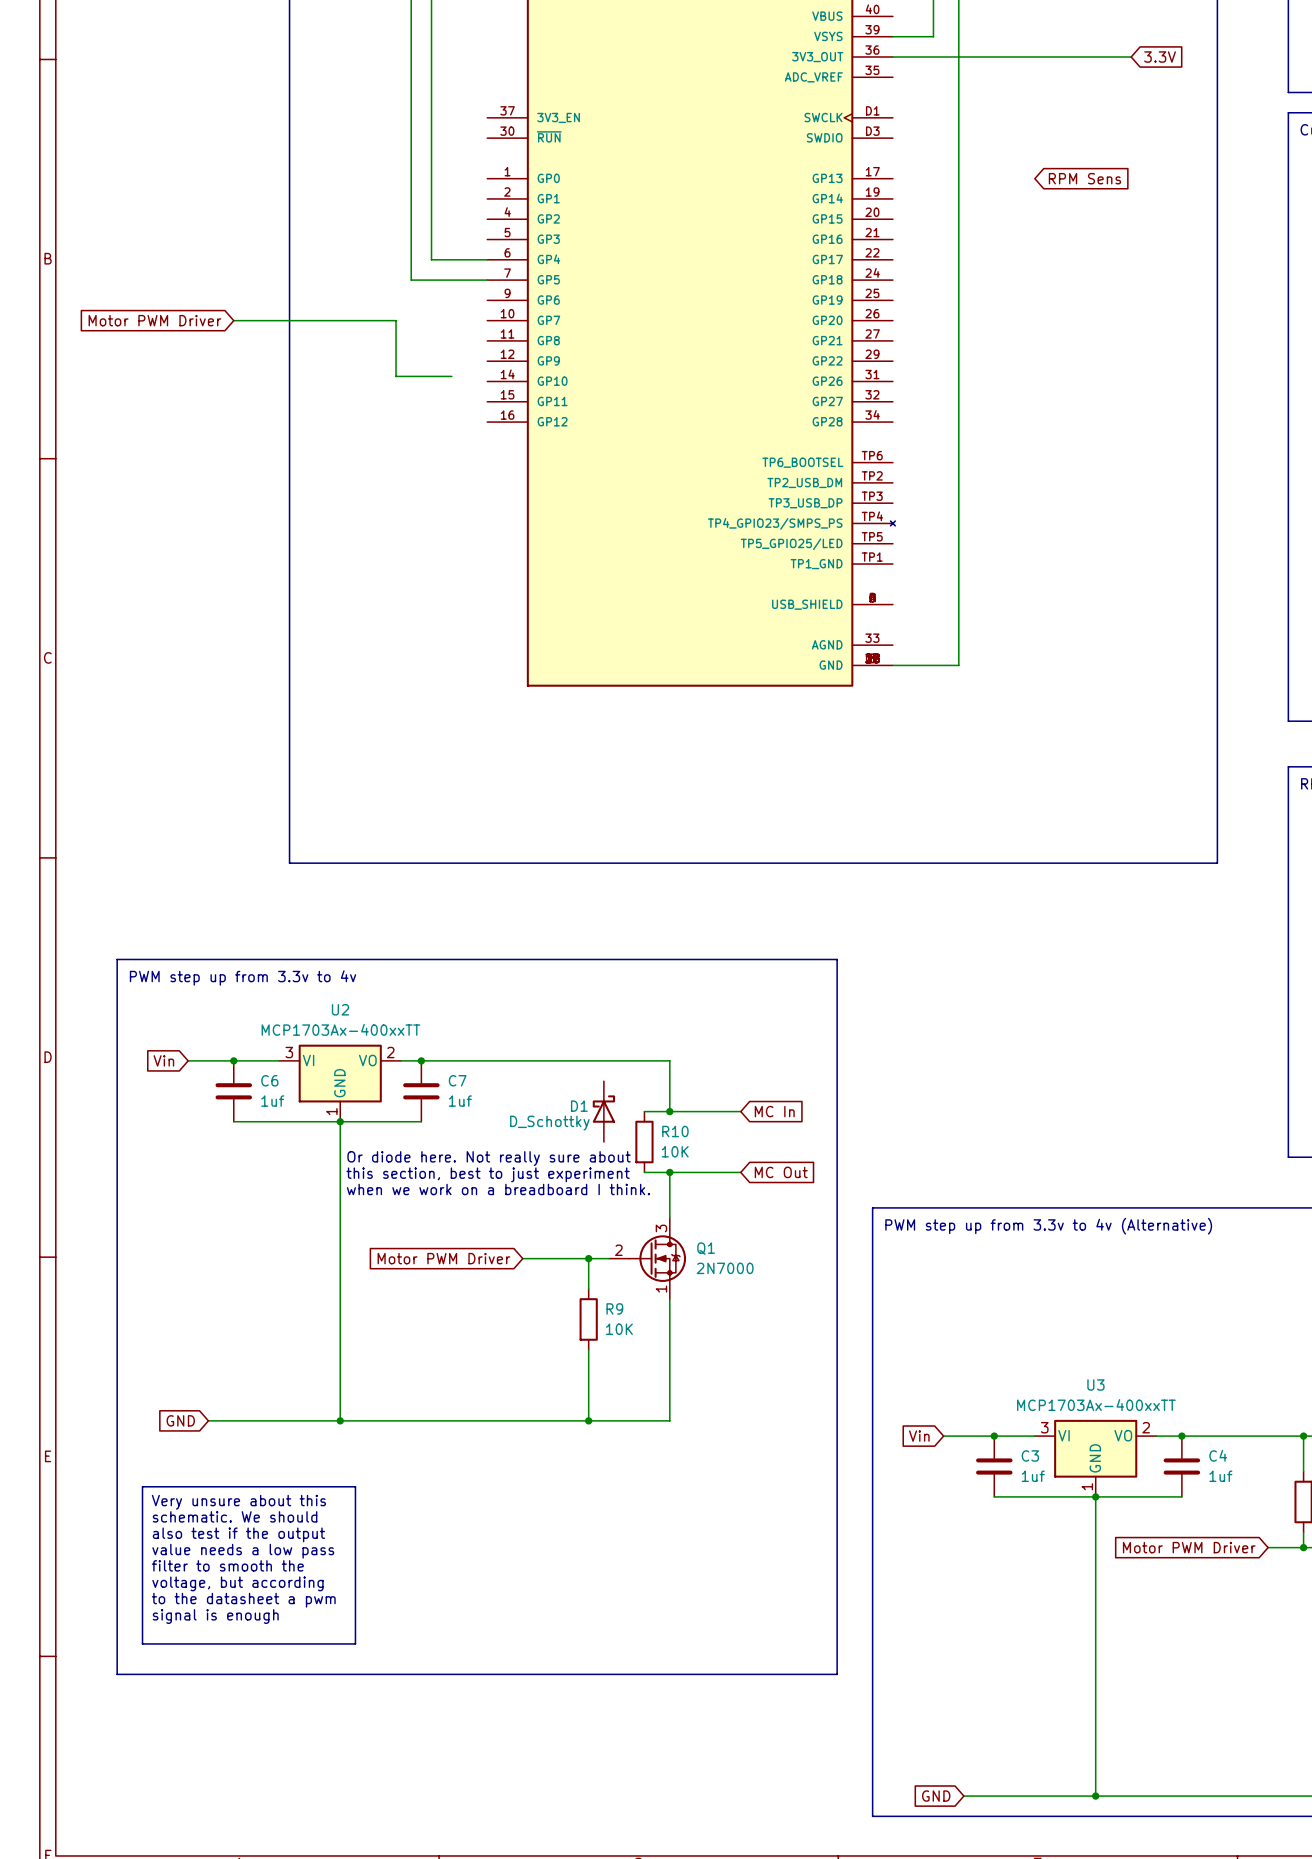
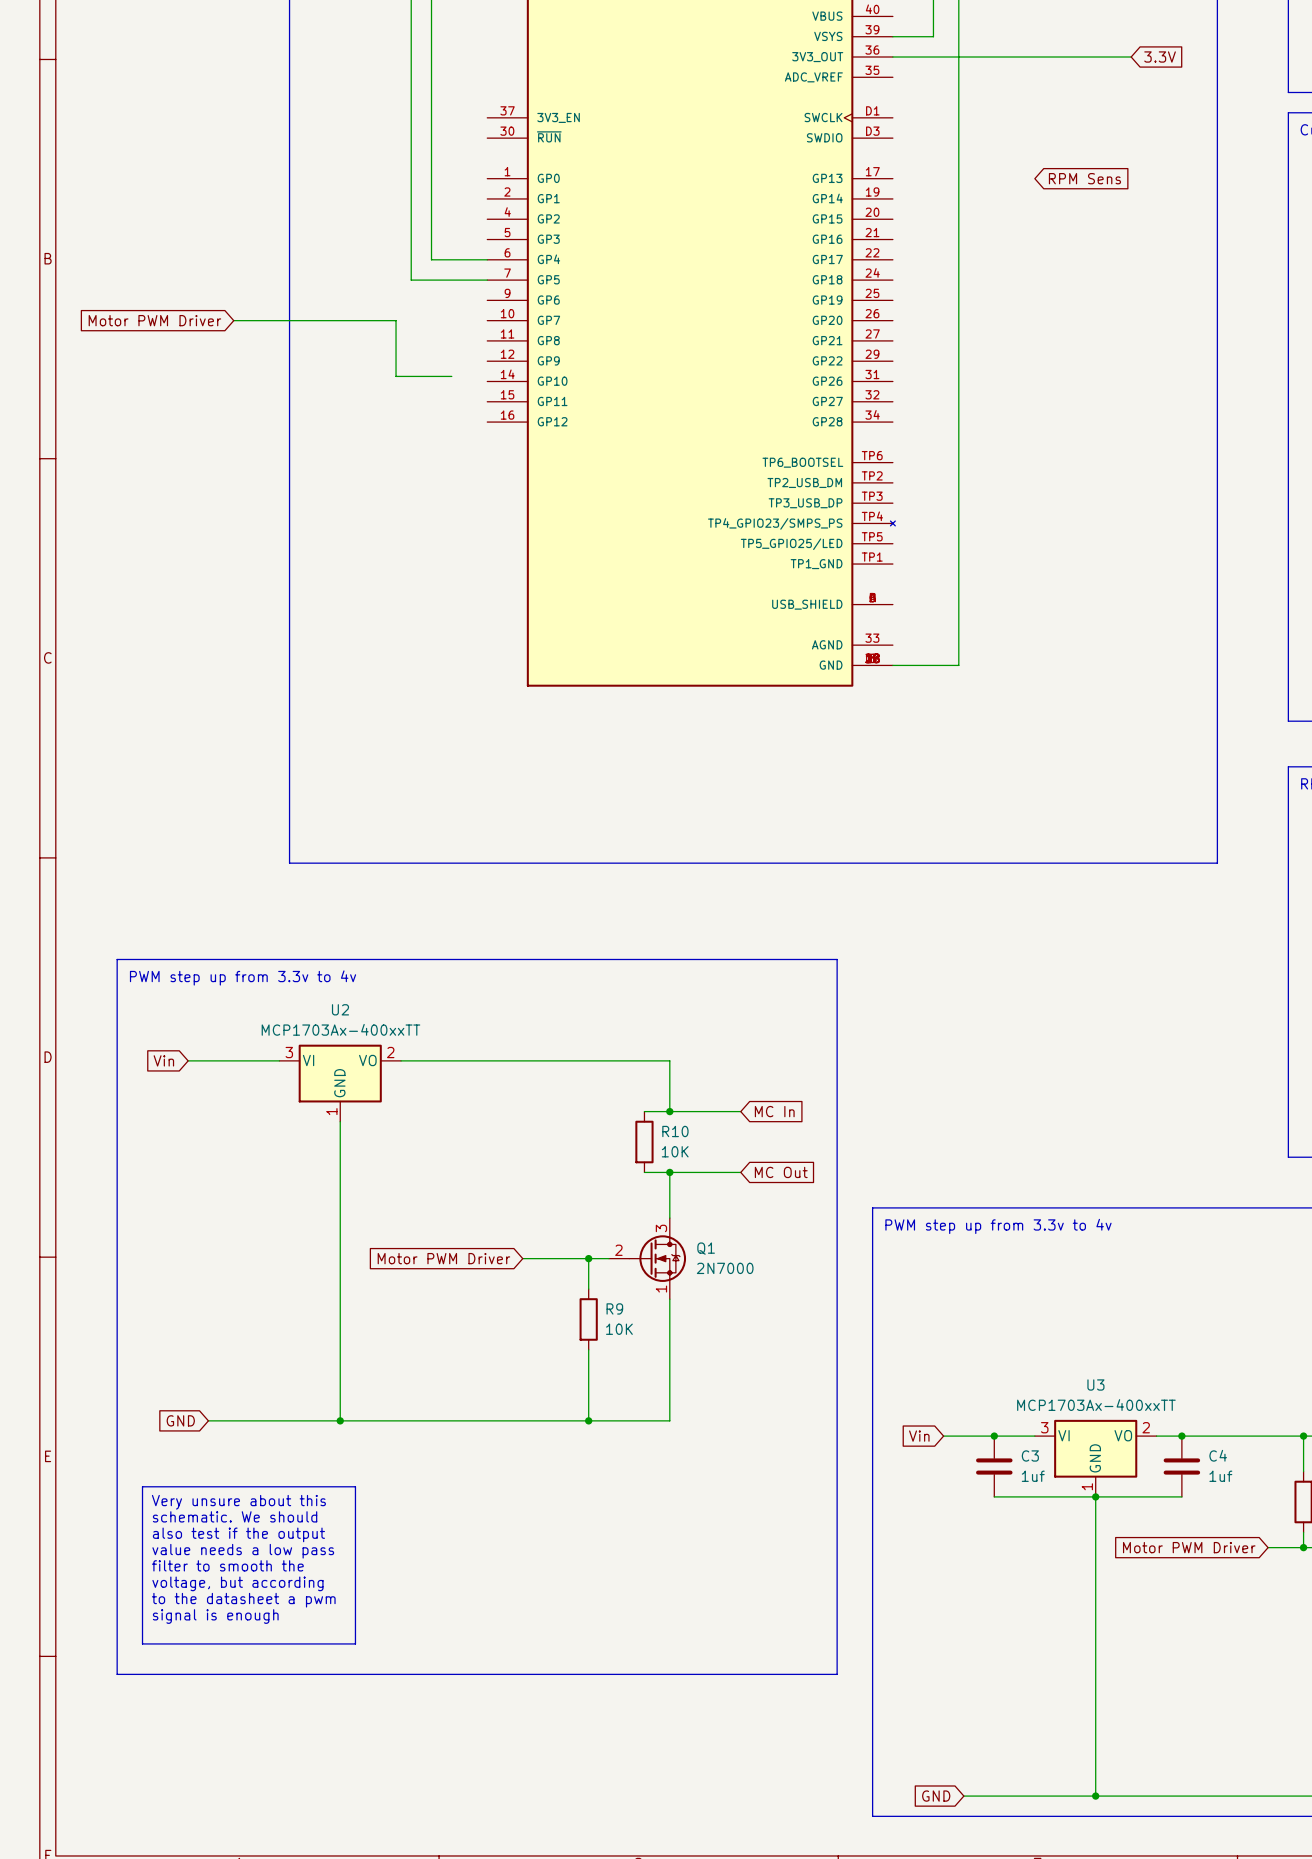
junction: (233, 1060) -> none
junction: (421, 1060) -> none
C6: 1uf (233, 1091) -> none
C7: 1uf (421, 1091) -> none
D1: D_Schottky (603, 1111) -> none
wire: (233, 1121) (421, 1121) -> none
junction: (340, 1121) -> none
text: Or diode here. Not really sure about (489, 1158) -> none
text: this section, best to just experiment (488, 1174) -> none
text: when we work on a breadboard I think. (498, 1189) -> none
text: PWM step up from 3.3v to 4v (Alternative) (1048, 1226) -> PWM step up from 3.3v to 4v (998, 1226)

